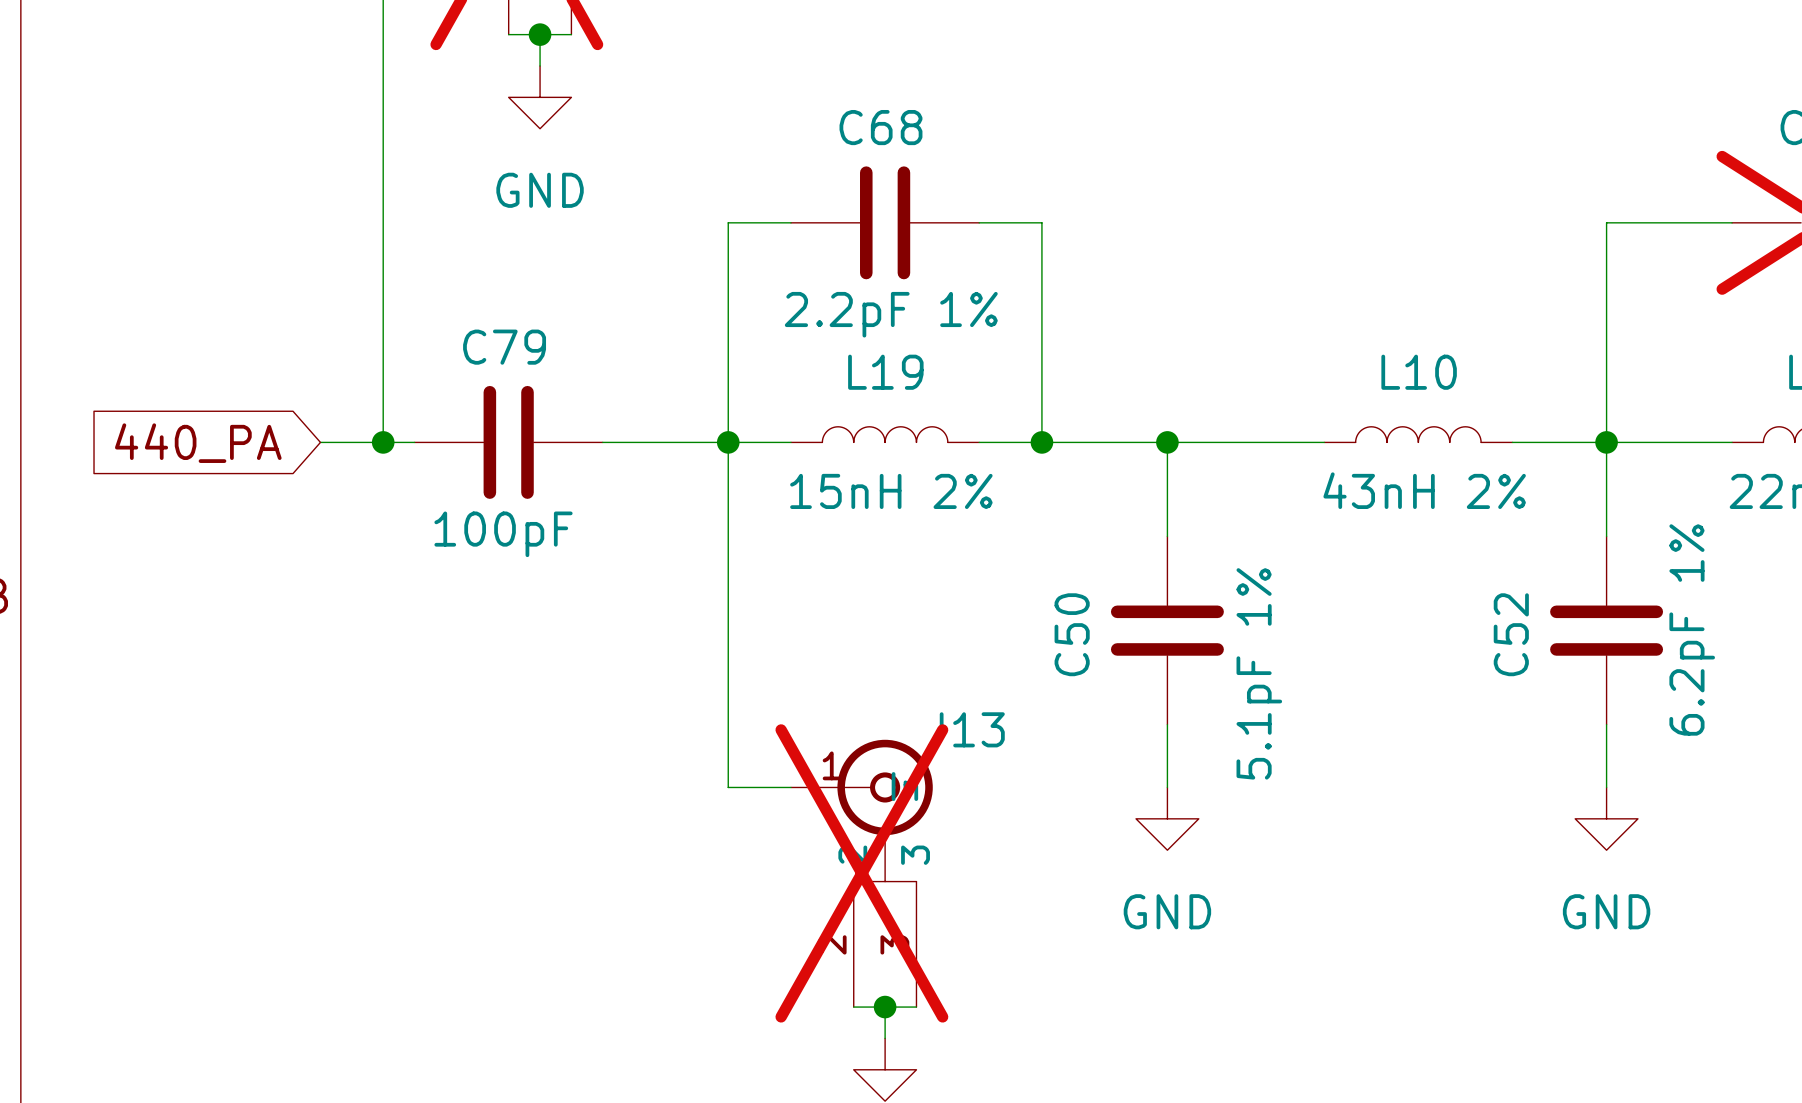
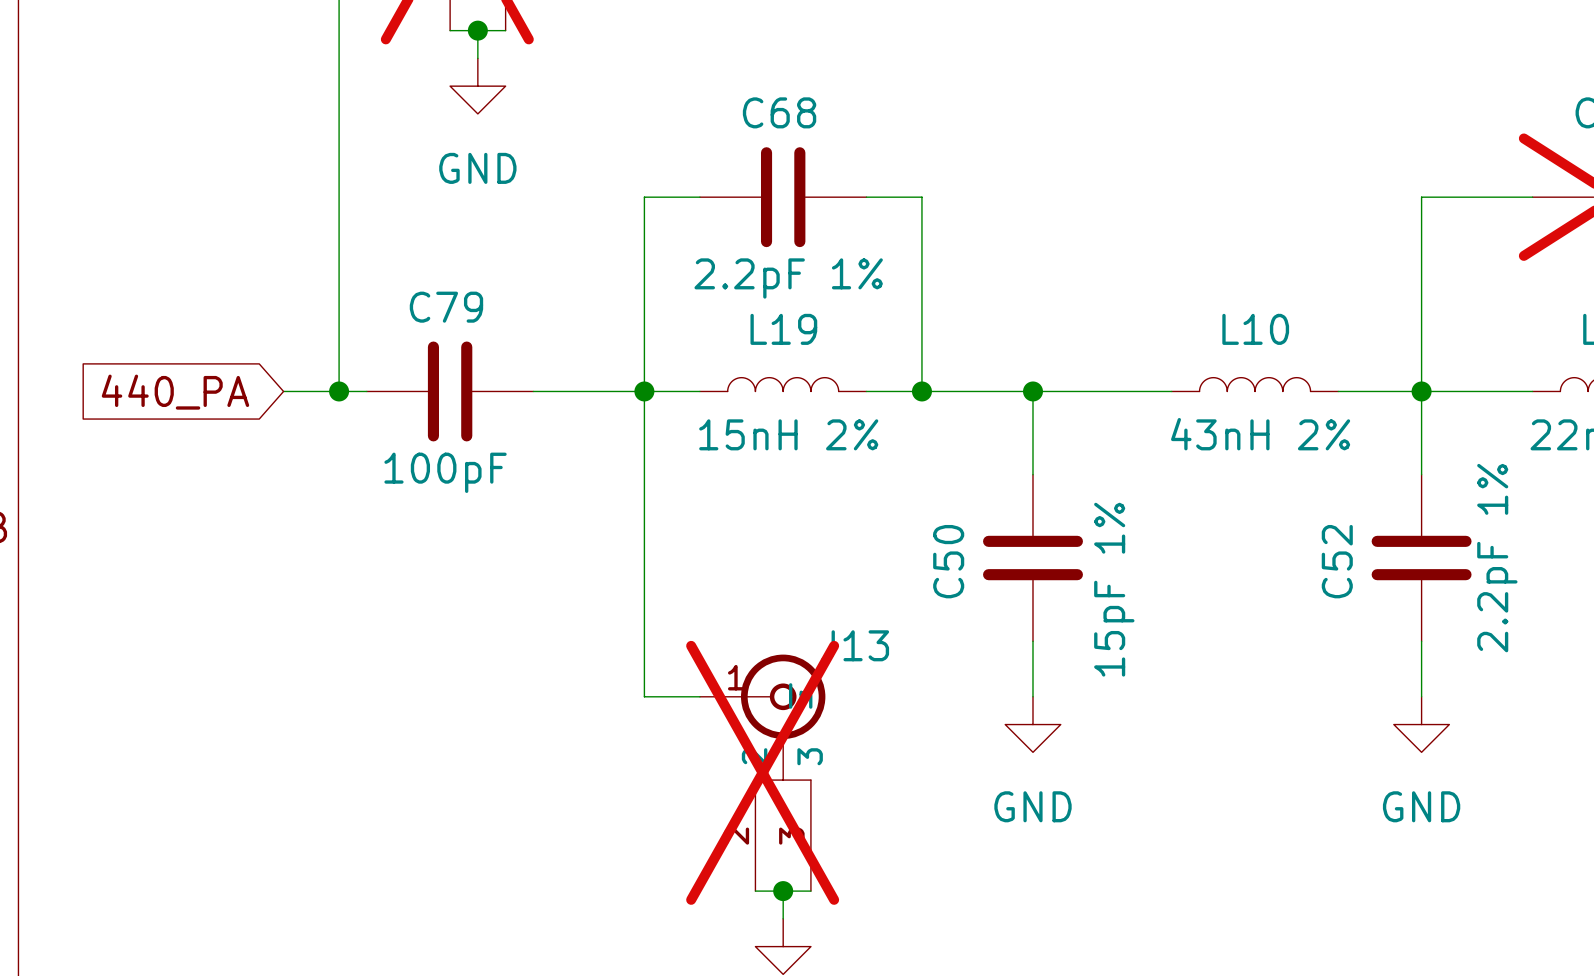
C52 value: 6.2pF 1% (1692, 629) -> 2.2pF 1% (1497, 558)
C50 value: 5.1pF 1% (1259, 673) -> 15pF 1% (1114, 589)

